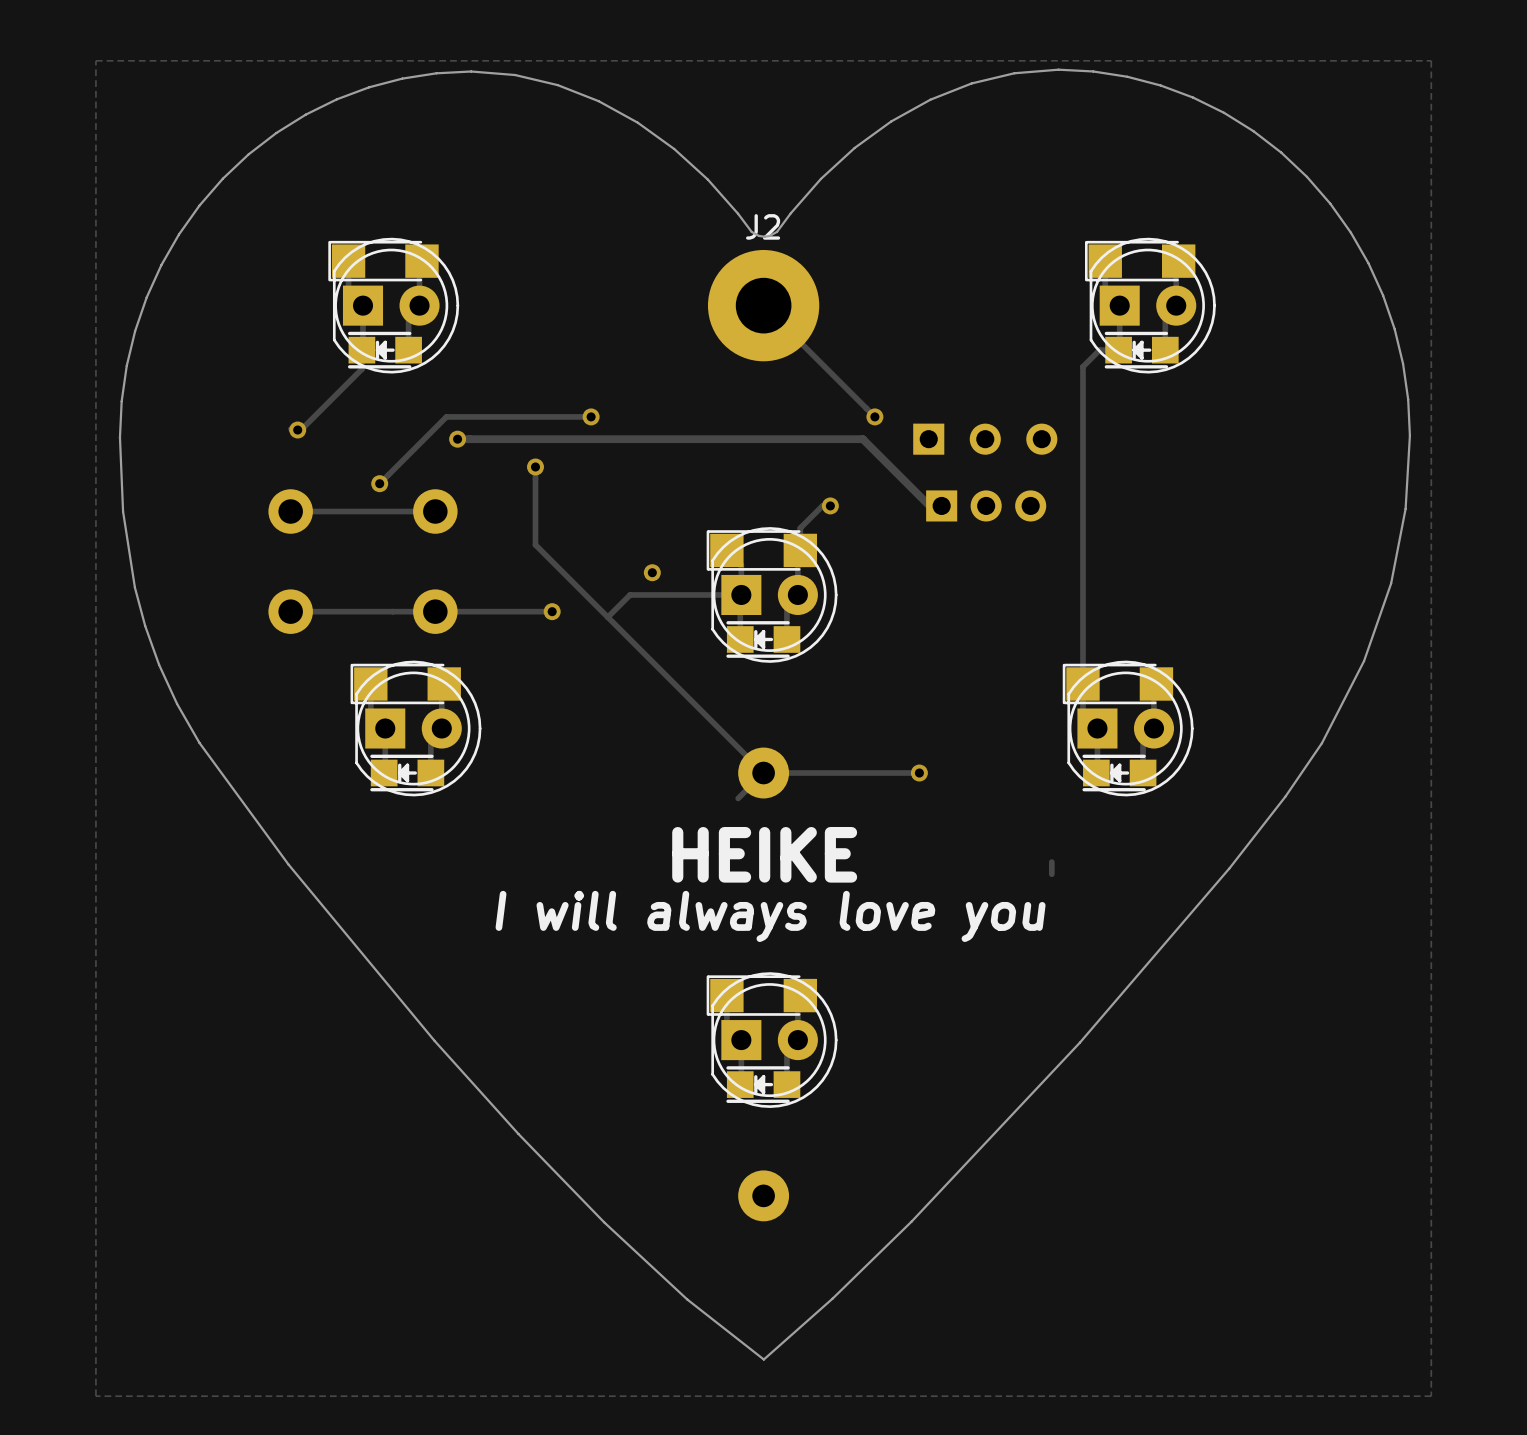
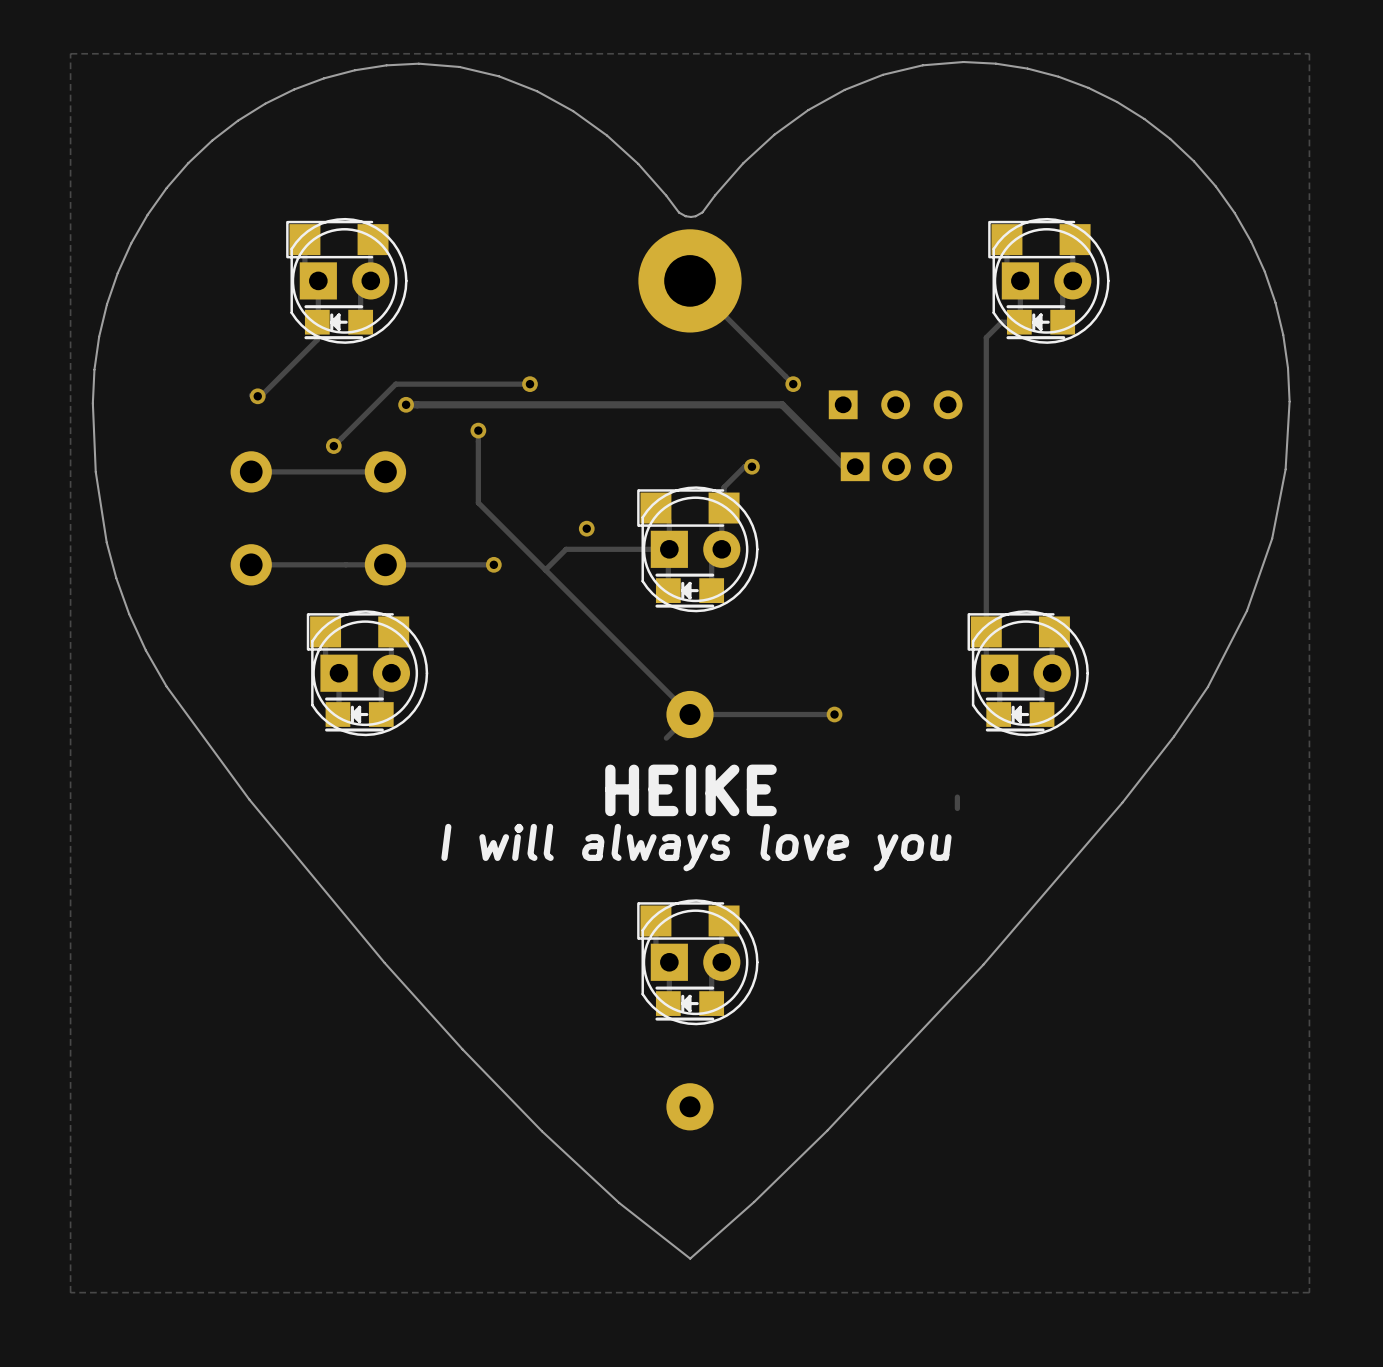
J2 name: J2 (763, 226) -> none

